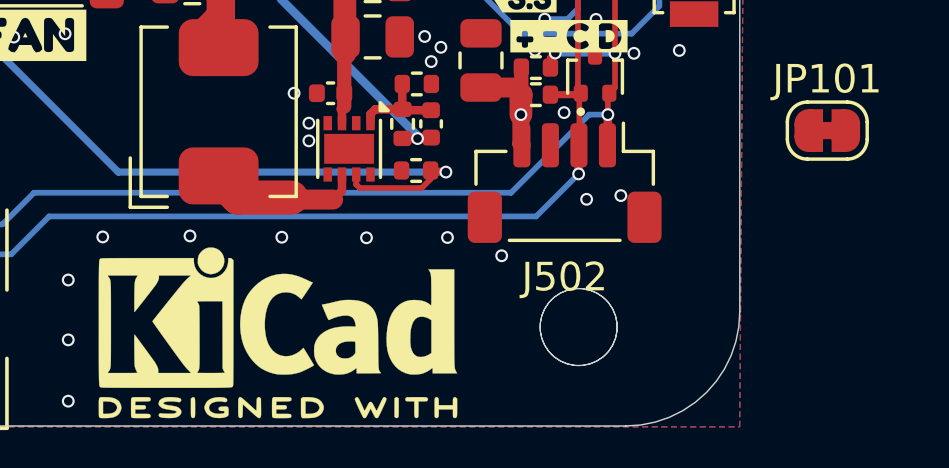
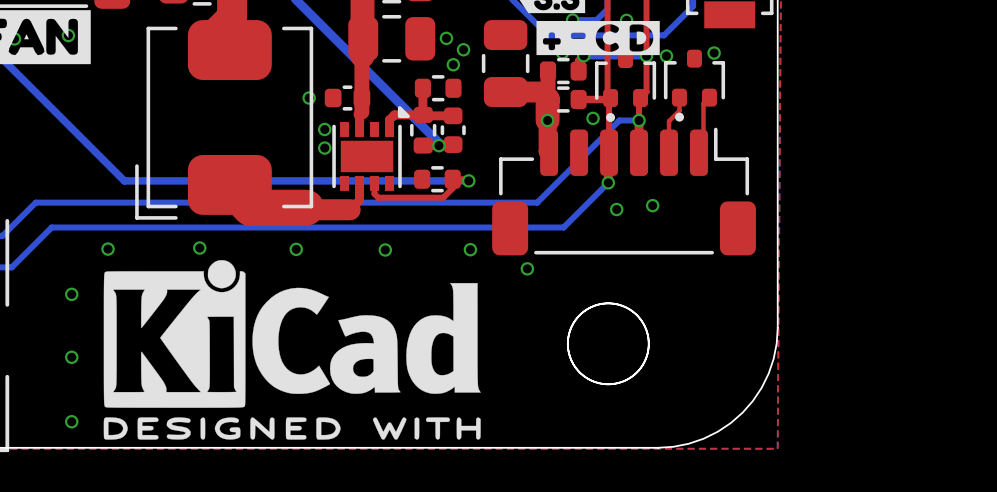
part: none -> (694, 85)
top track: none -> (679, 97) (679, 110) (669, 121) (669, 152)
top track: none -> (709, 97) (703, 103) (703, 148) (698, 152)
JP101: (827, 130) -> none
J502: (564, 182) -> none
part: none -> (624, 191)

